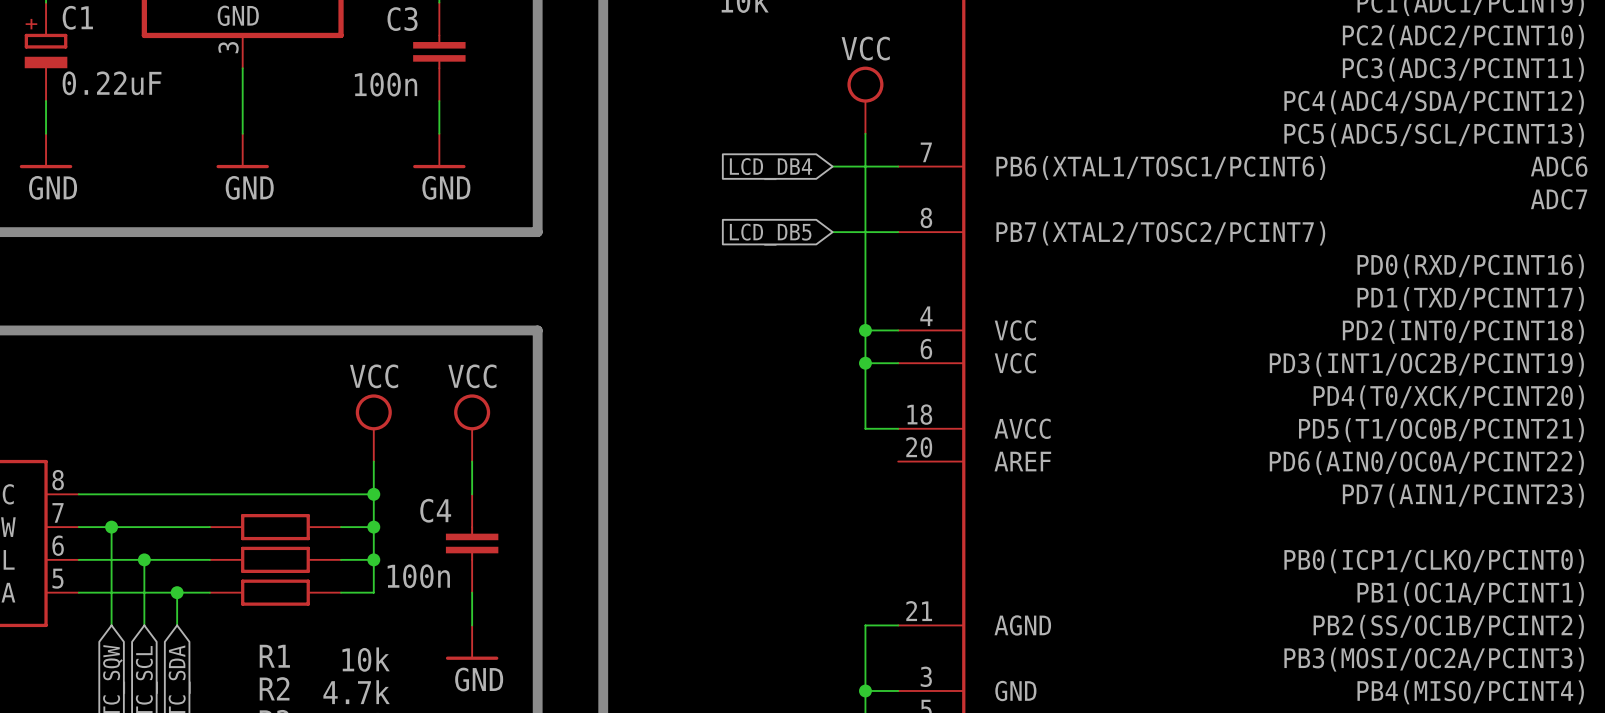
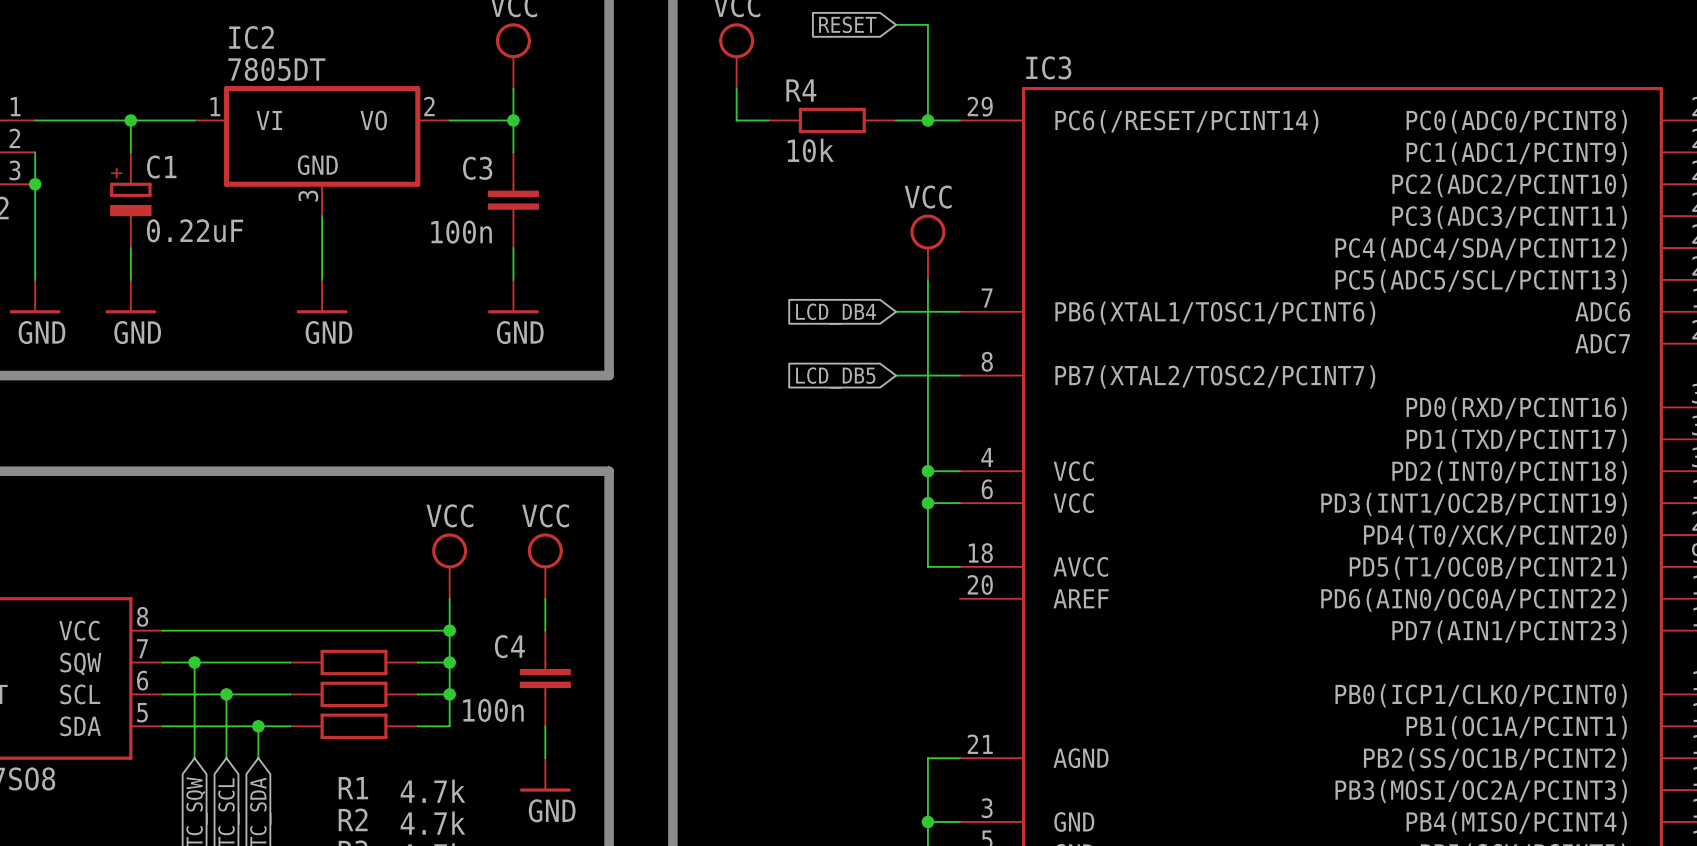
R1 value: 10k (366, 659) -> 4.7k (432, 791)

